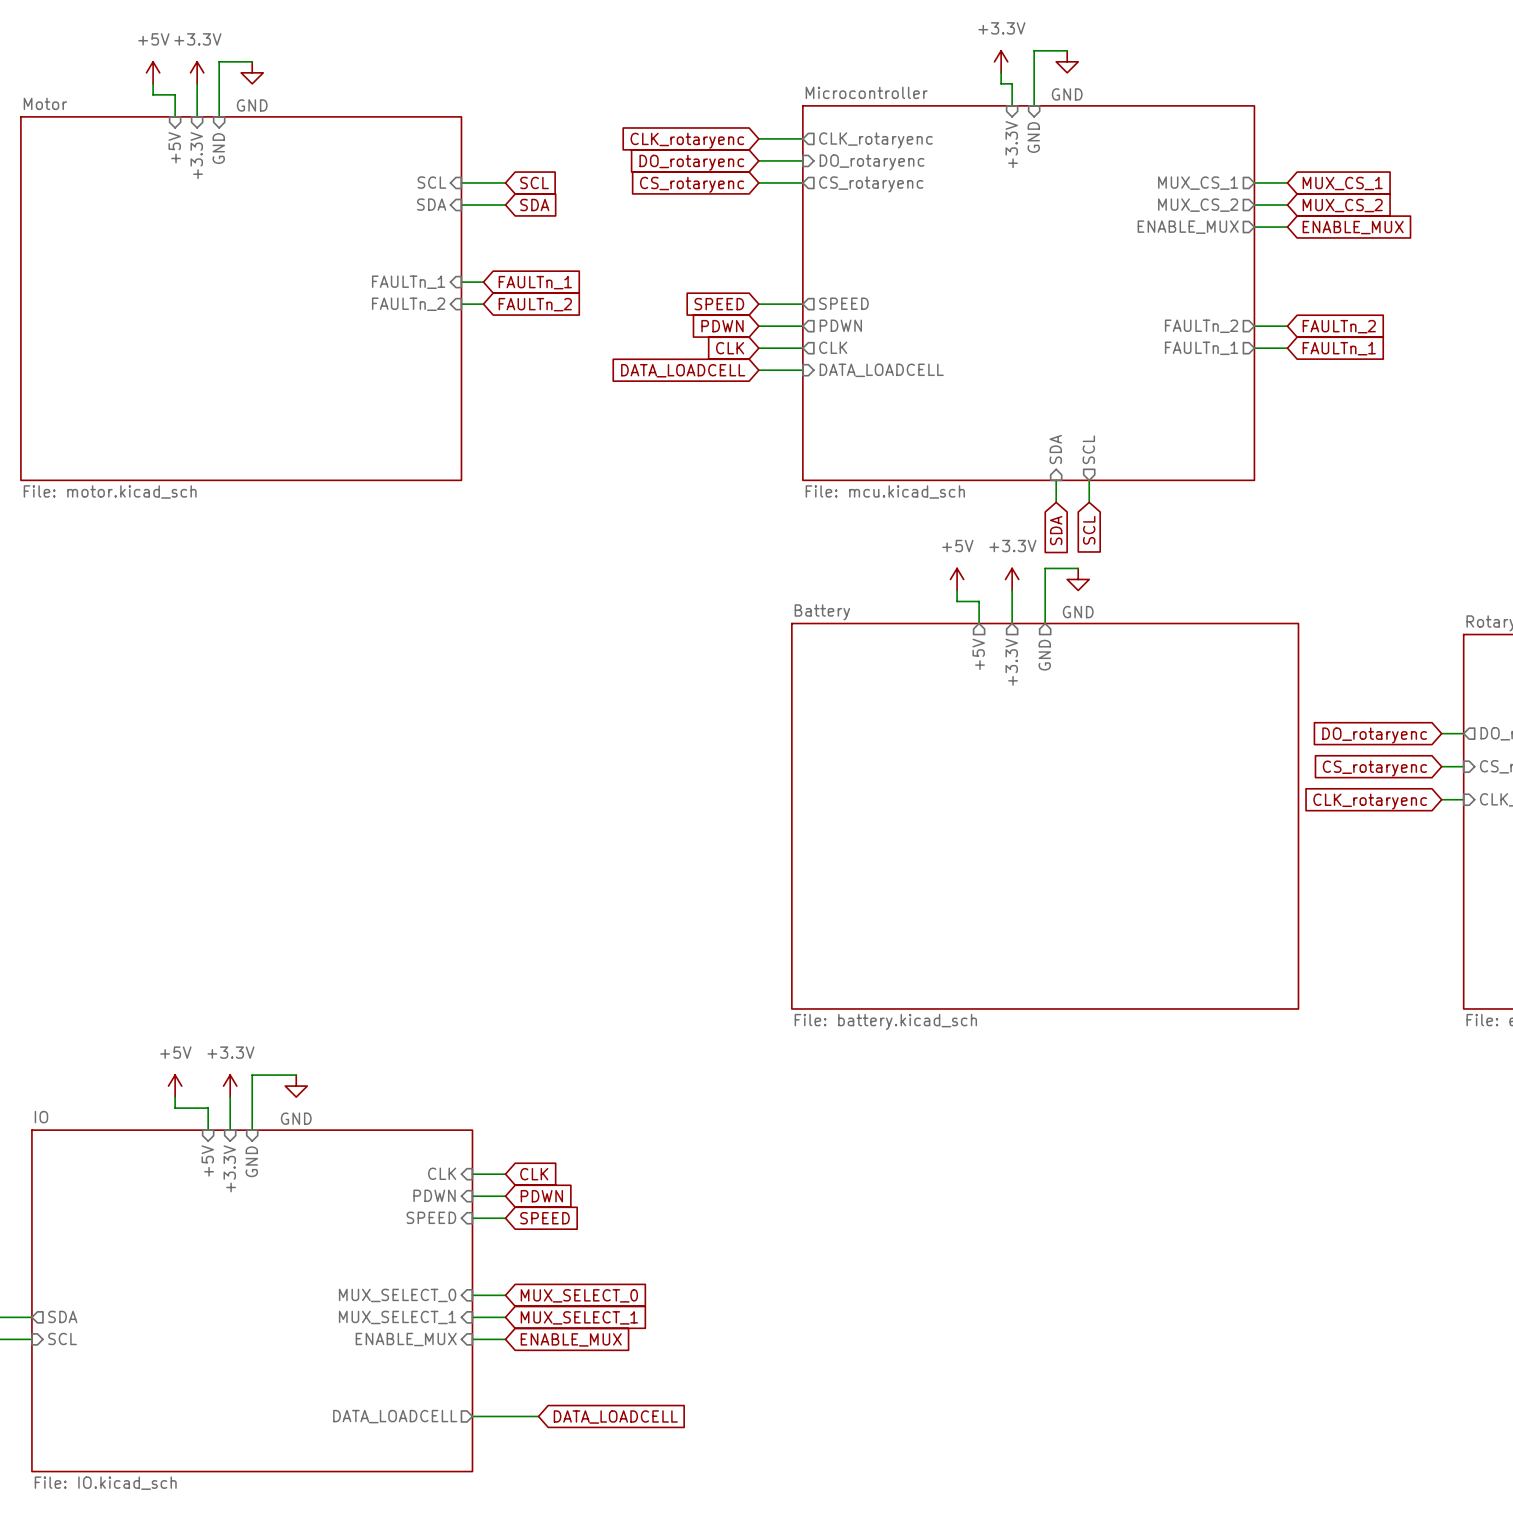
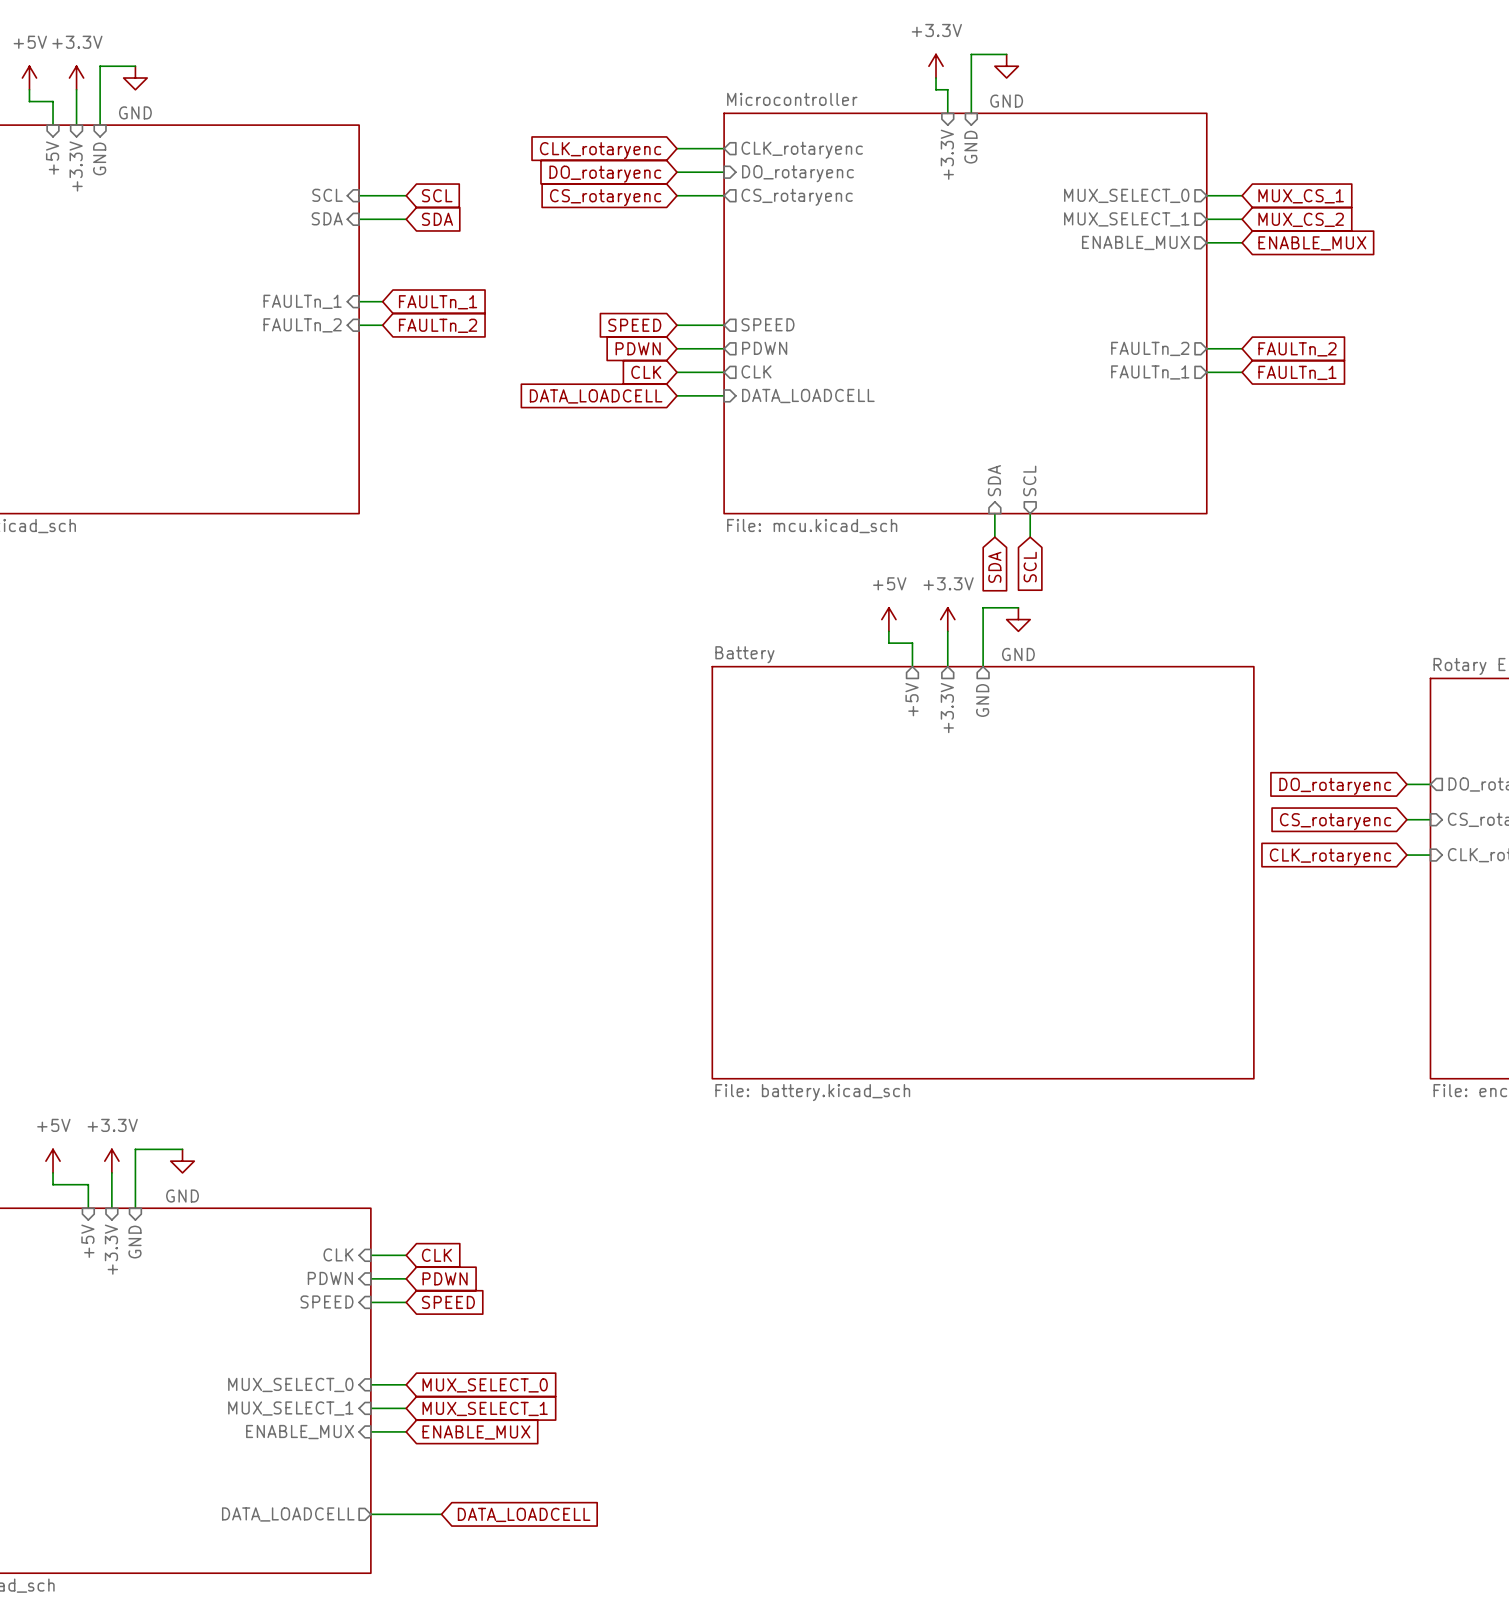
sheet pin: MUX_CS_1 (1198, 183) -> MUX_SELECT_0 (1126, 195)
sheet pin: MUX_CS_2 (1198, 205) -> MUX_SELECT_1 (1126, 219)

